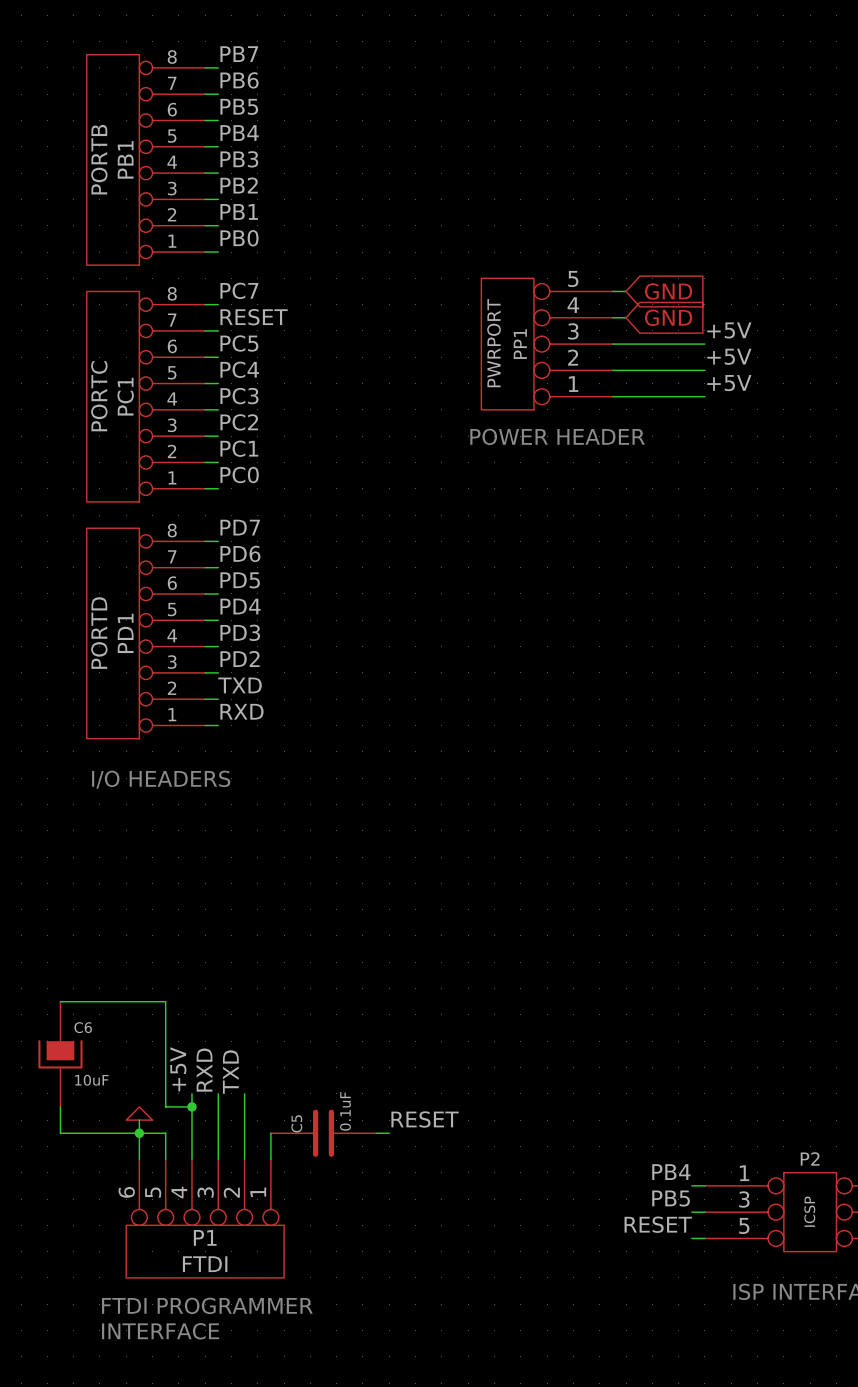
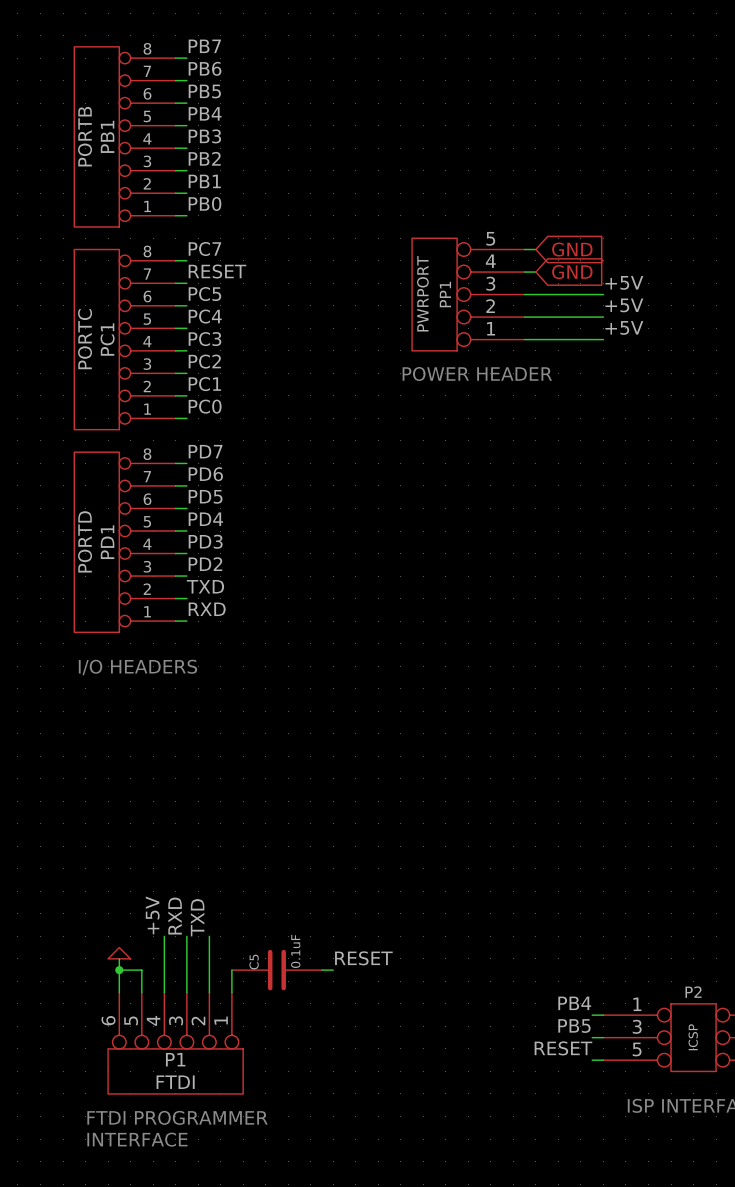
wire: (60, 1001) (165, 1001) (165, 1106) (191, 1106) -> none
C6: 10uF (60, 1054) -> none
wire: (60, 1106) (60, 1133) (139, 1133) -> none
junction: (191, 1106) -> none

